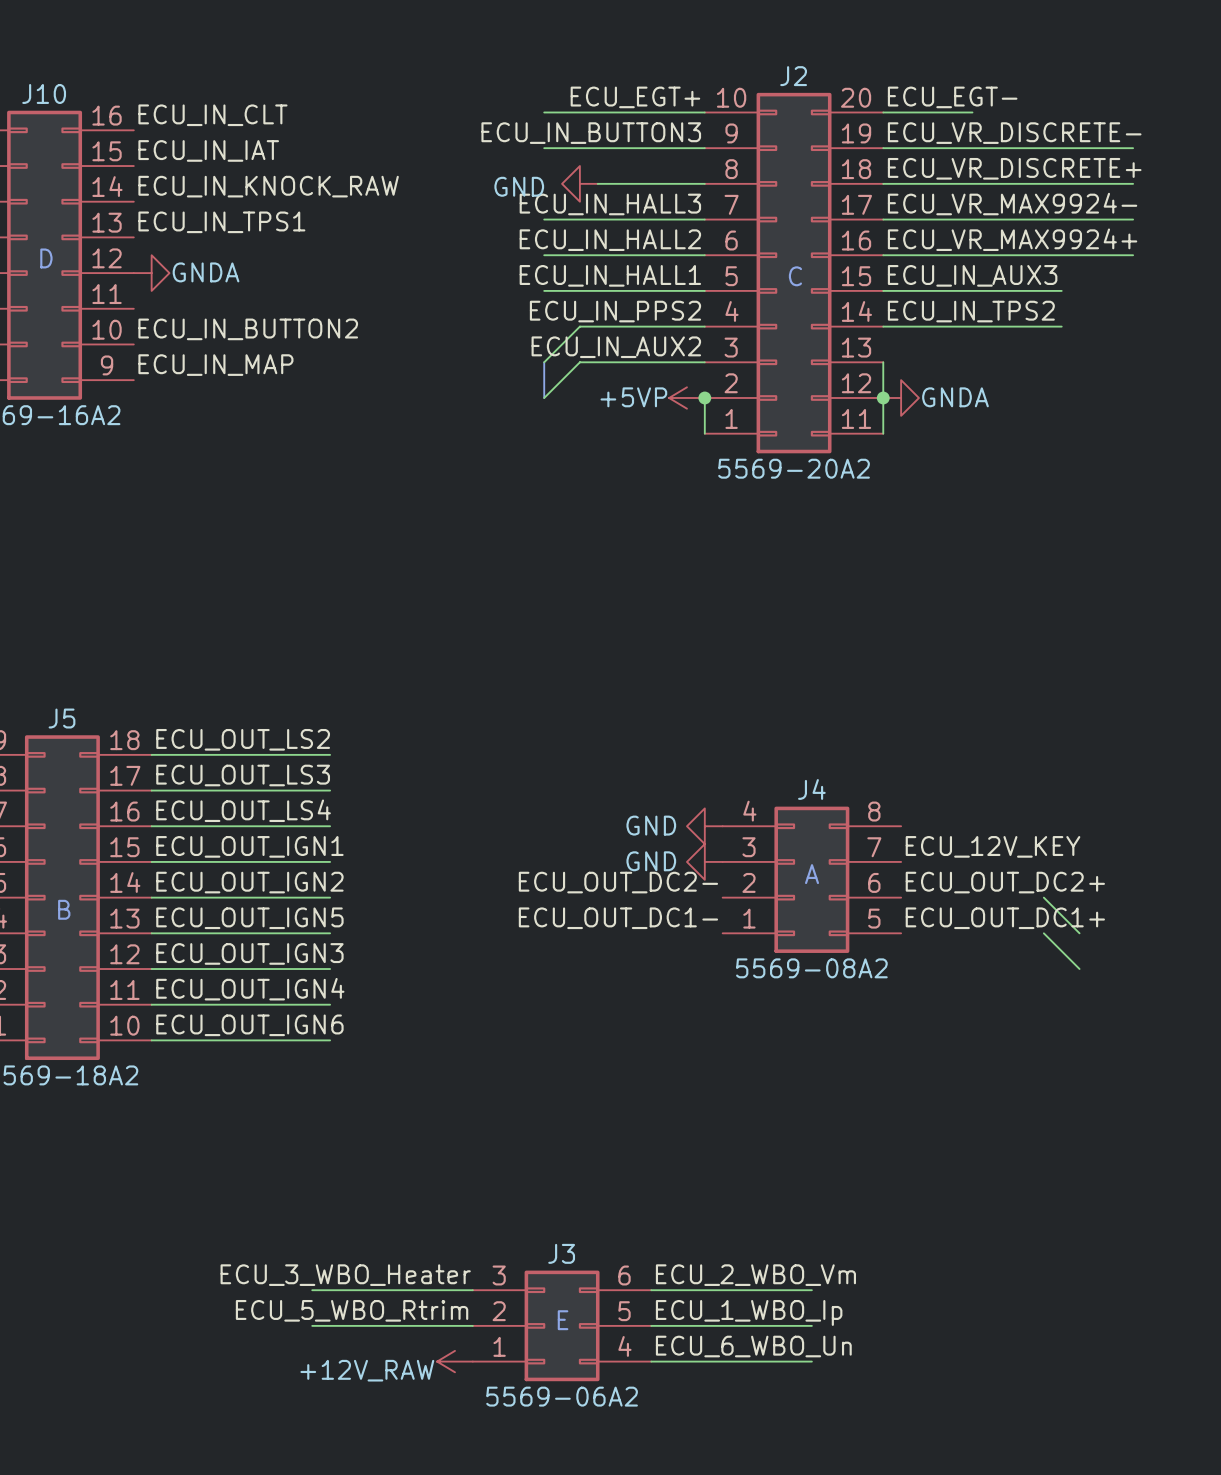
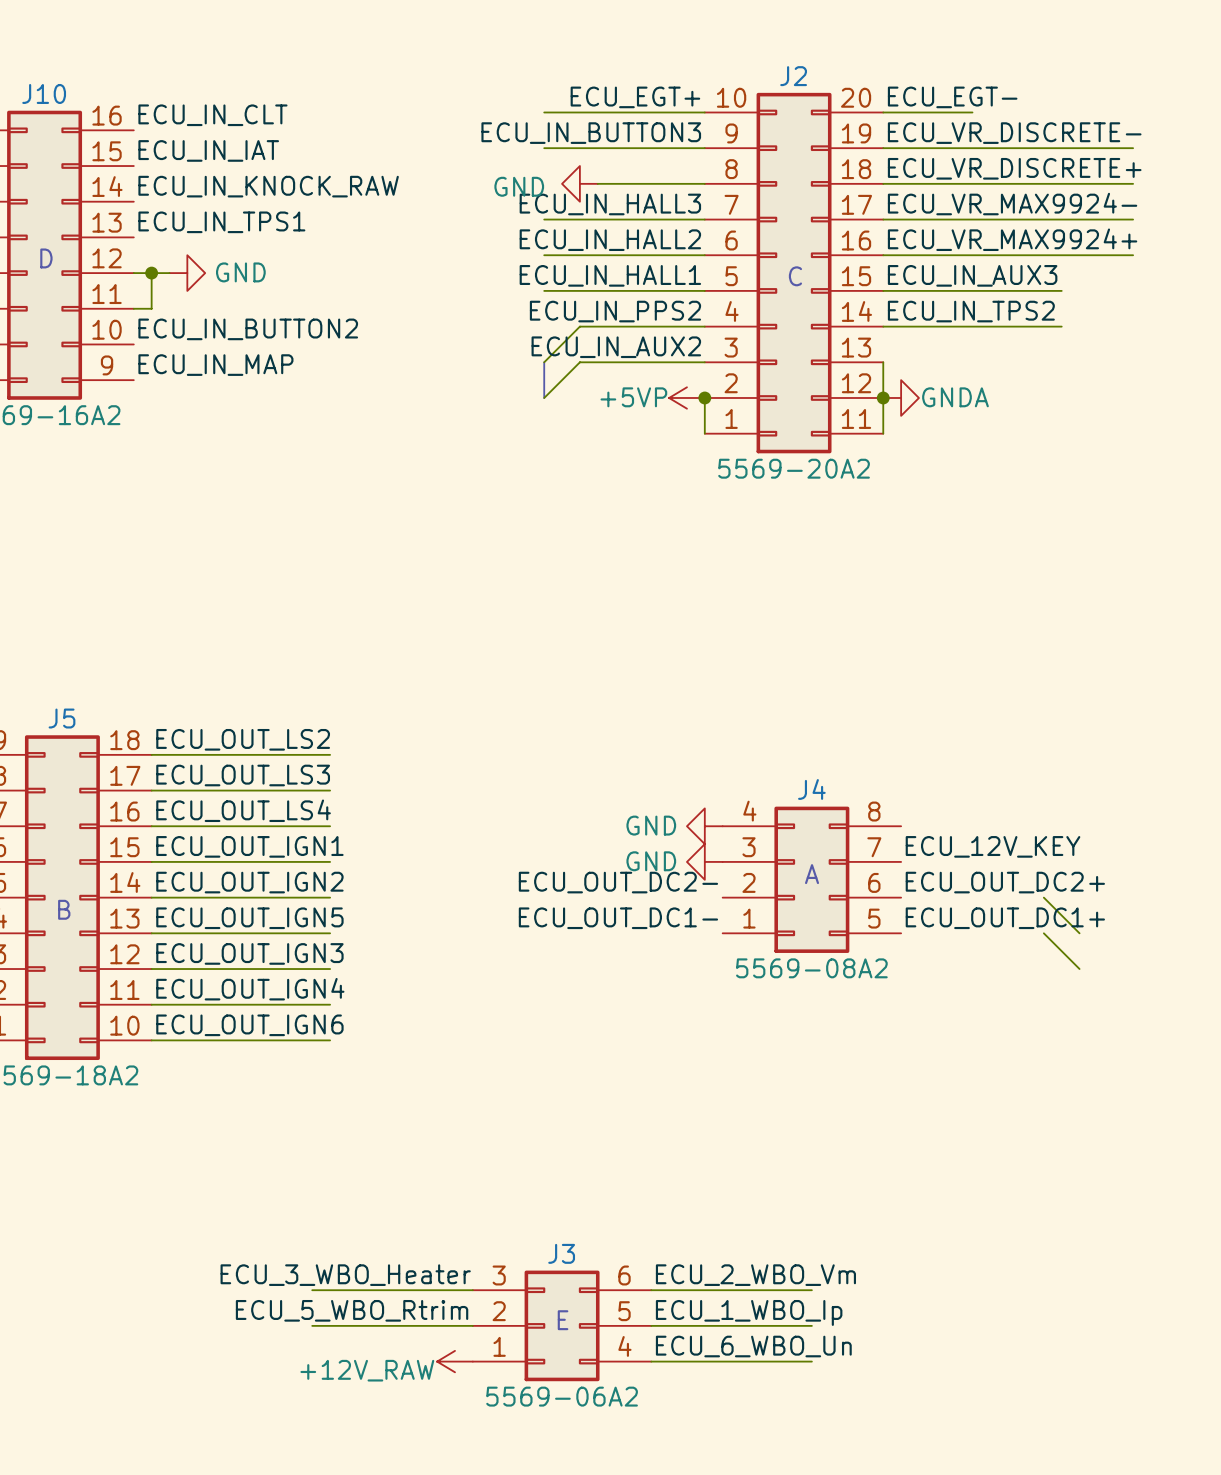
wire: none -> (151, 273) (151, 308) (133, 308)
power symbol: GNDA (151, 273) -> none
junction: none -> (151, 273)
power symbol: none -> GND (187, 273)

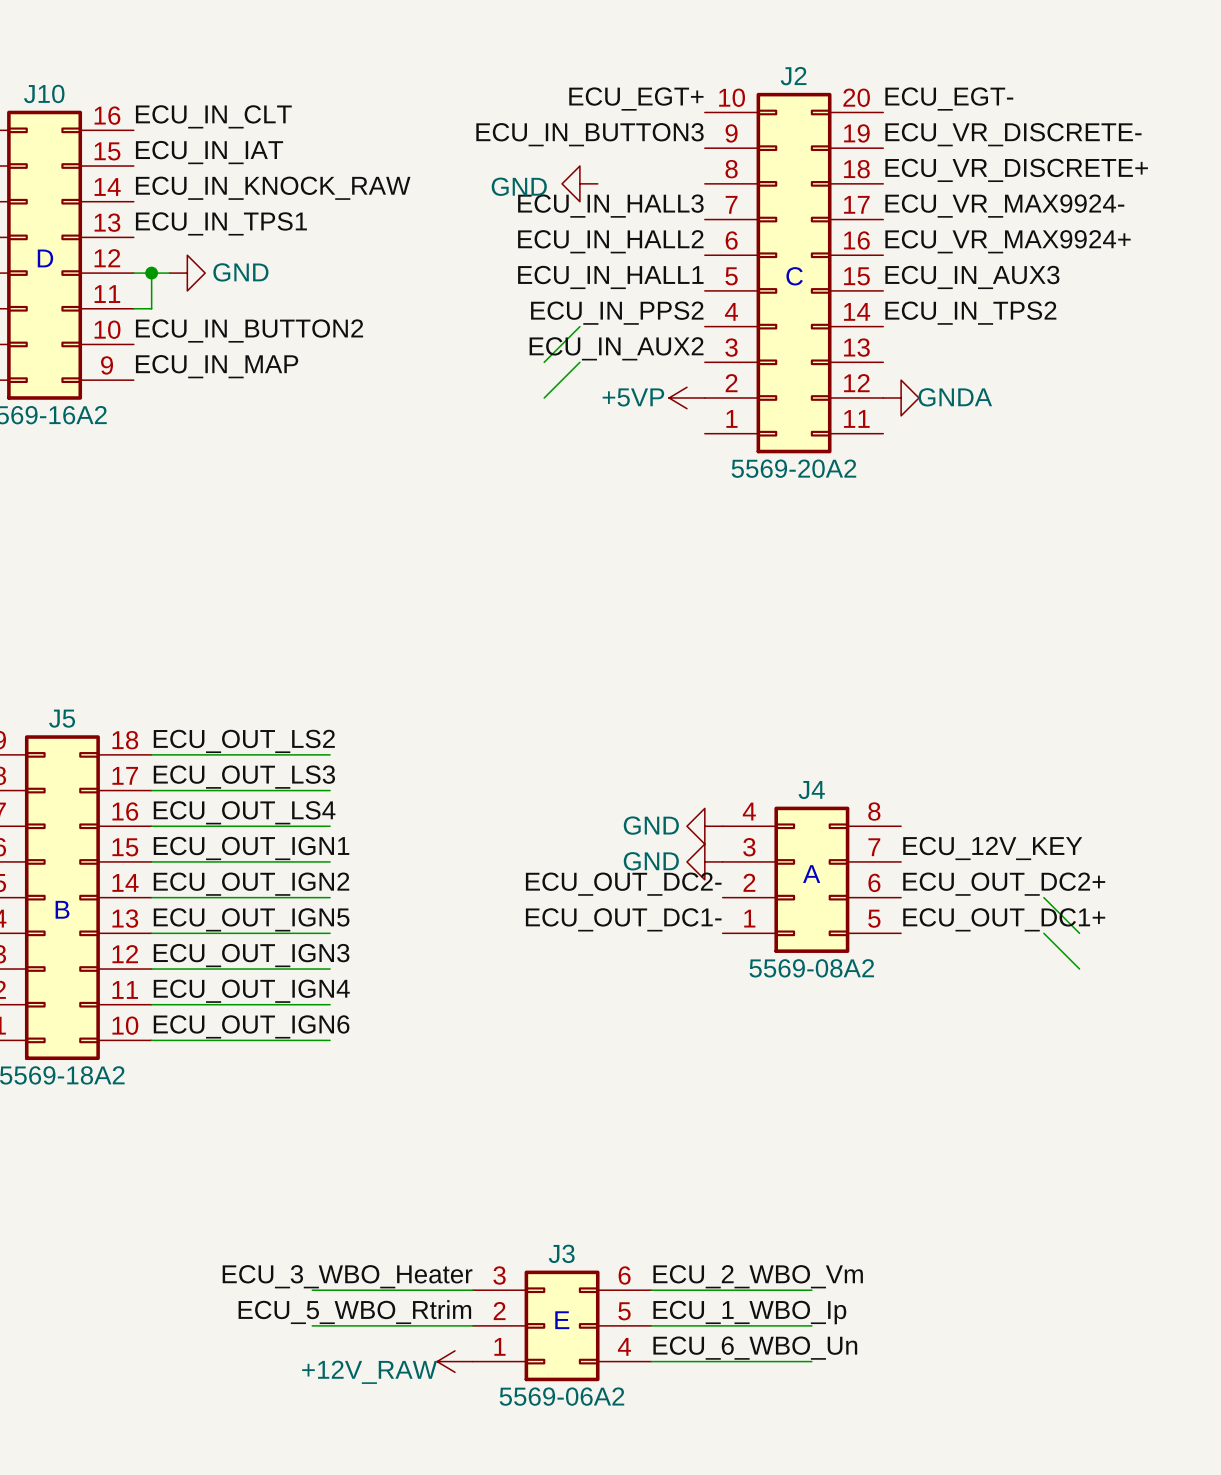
wire: (544, 112) (704, 112) -> none
wire: (883, 112) (972, 112) -> none
wire: (544, 148) (704, 148) -> none
wire: (883, 148) (1133, 148) -> none
wire: (597, 183) (704, 183) -> none
wire: (883, 183) (1133, 183) -> none
wire: (544, 219) (704, 219) -> none
wire: (883, 219) (1133, 219) -> none
wire: (544, 255) (704, 255) -> none
wire: (883, 255) (1133, 255) -> none
wire: (544, 290) (704, 290) -> none
wire: (883, 290) (1061, 290) -> none
wire: (579, 326) (704, 326) -> none
wire: (883, 326) (1061, 326) -> none
bus: (544, 362) (544, 397) -> none
wire: (579, 362) (704, 362) -> none
wire: (883, 362) (883, 433) -> none
wire: (704, 397) (704, 433) -> none
junction: (704, 397) -> none
junction: (883, 397) -> none

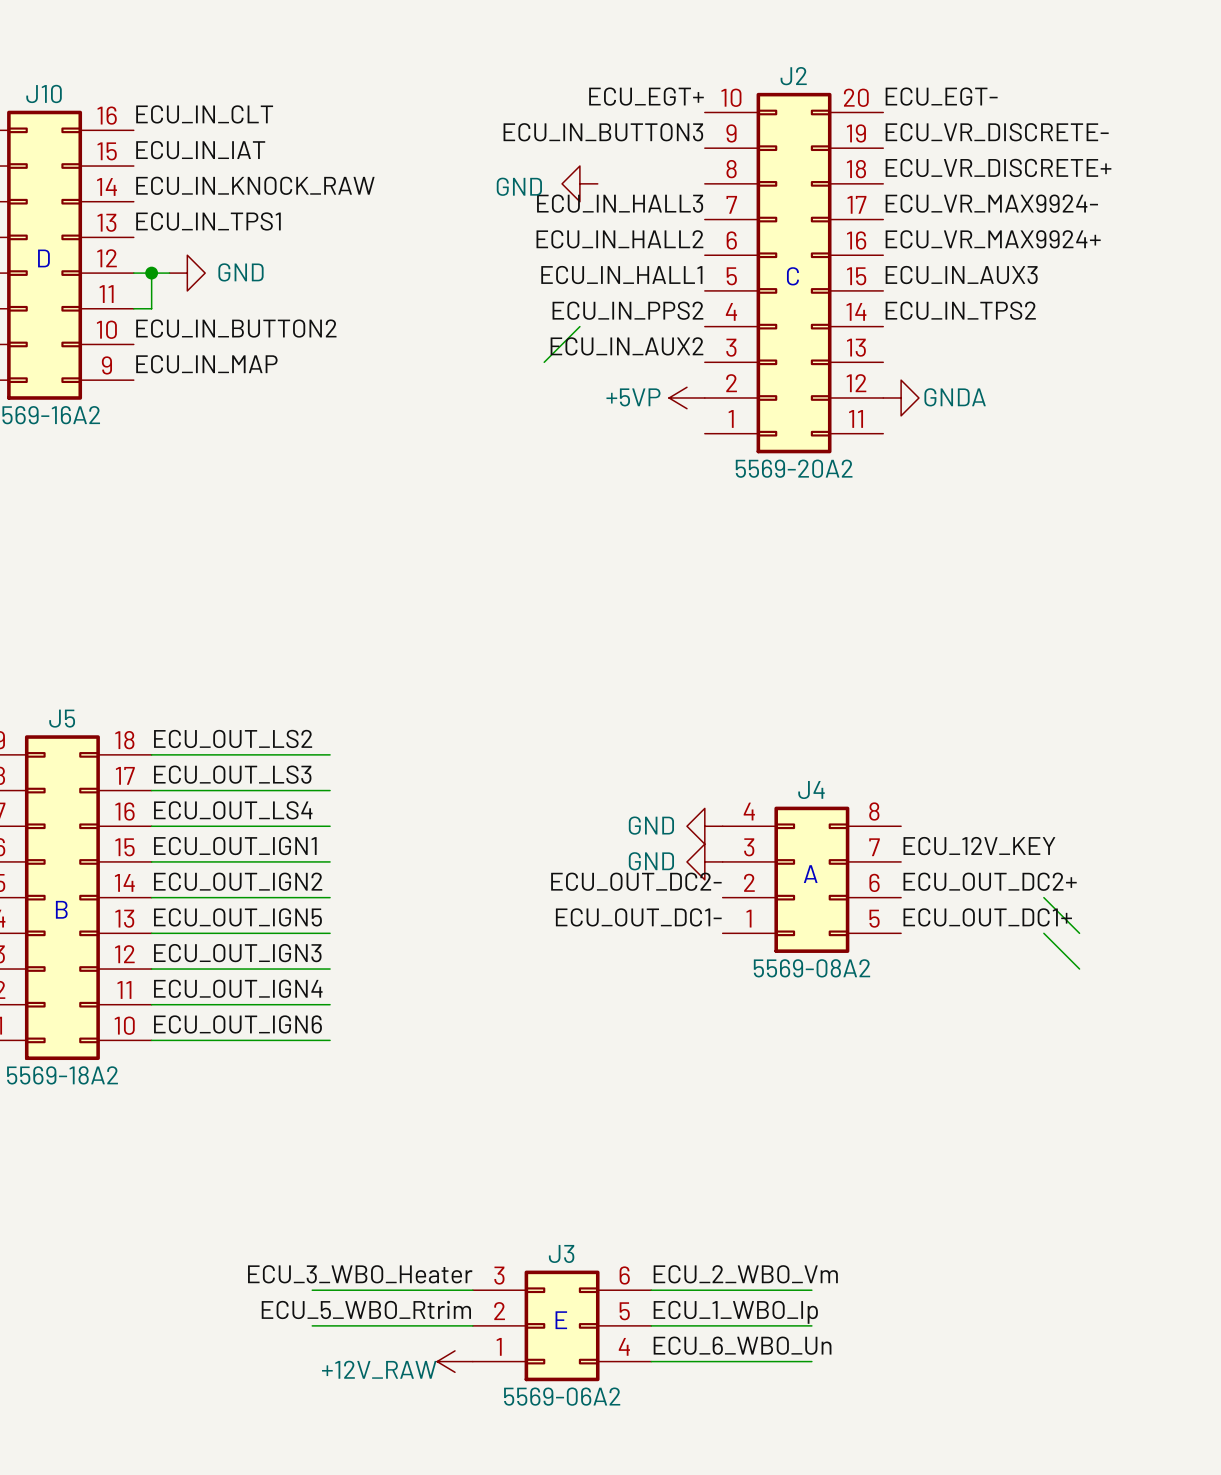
wire: (579, 362) (544, 397) -> none

